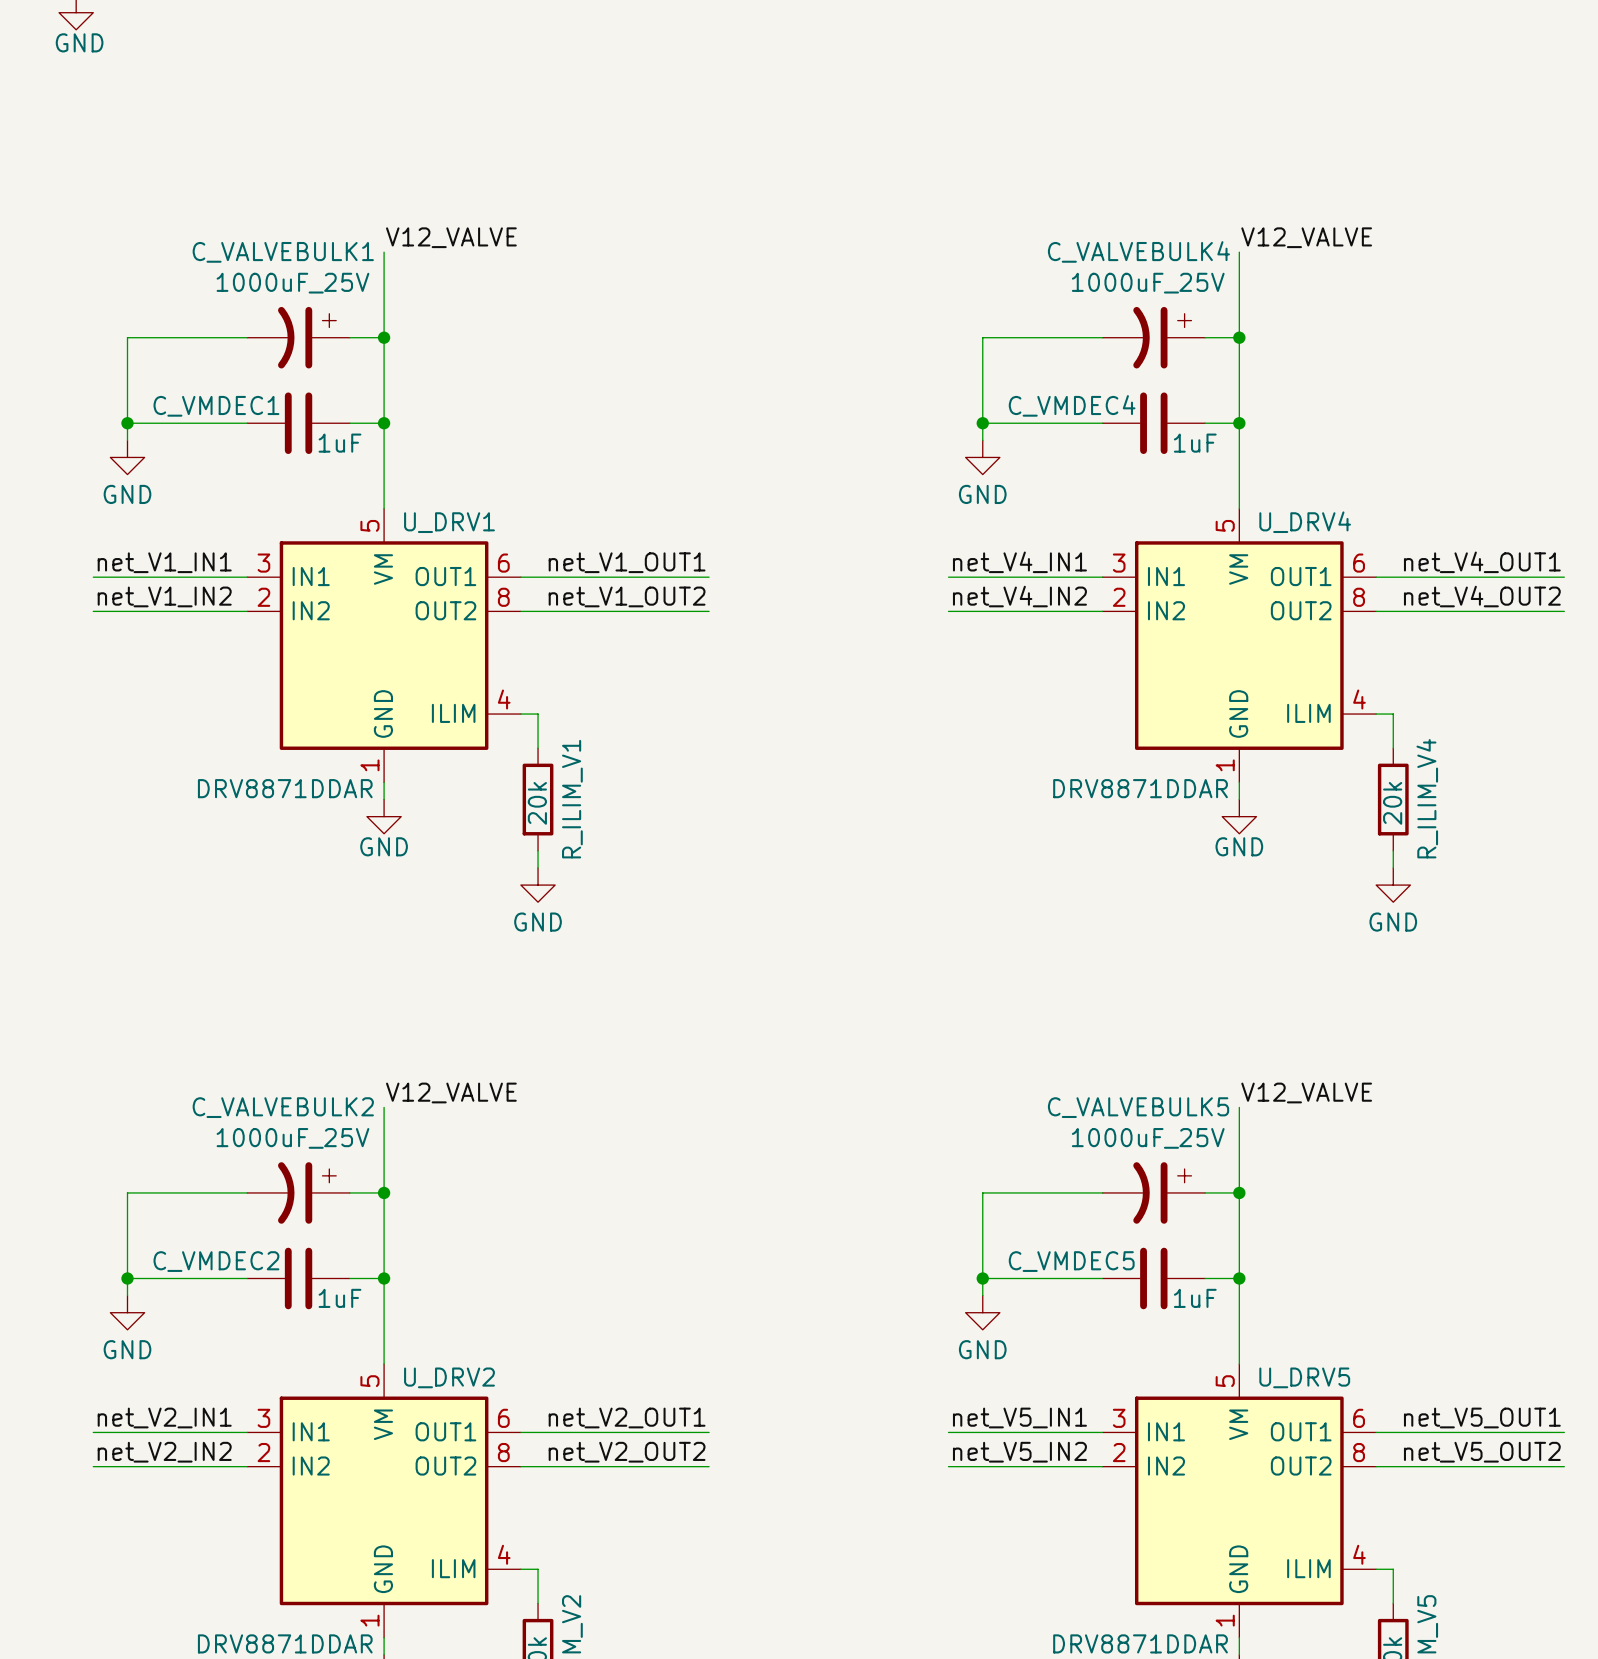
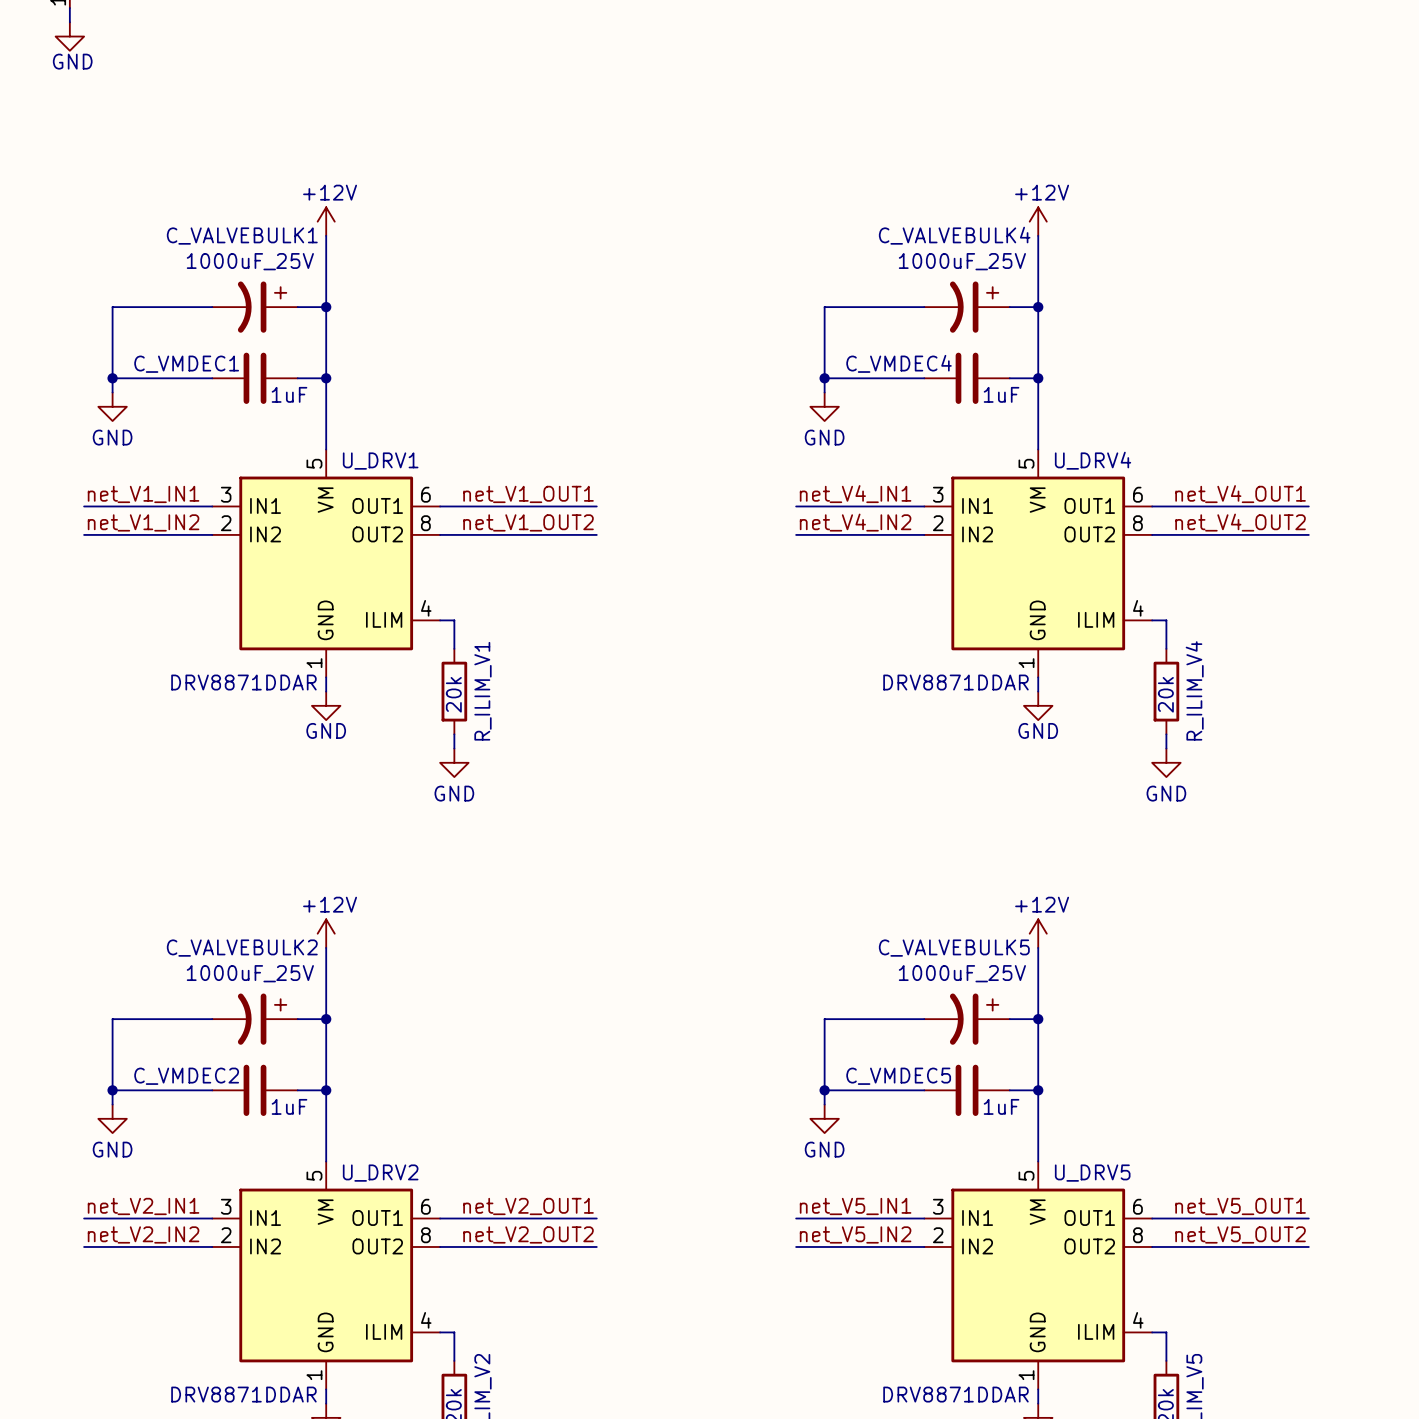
power symbol: none -> +12V (326, 221)
power symbol: none -> +12V (1038, 221)
label: V12_VALVE (451, 237) -> none
label: V12_VALVE (1306, 237) -> none
power symbol: none -> +12V (326, 933)
power symbol: none -> +12V (1038, 933)
label: V12_VALVE (451, 1092) -> none
label: V12_VALVE (1306, 1092) -> none

